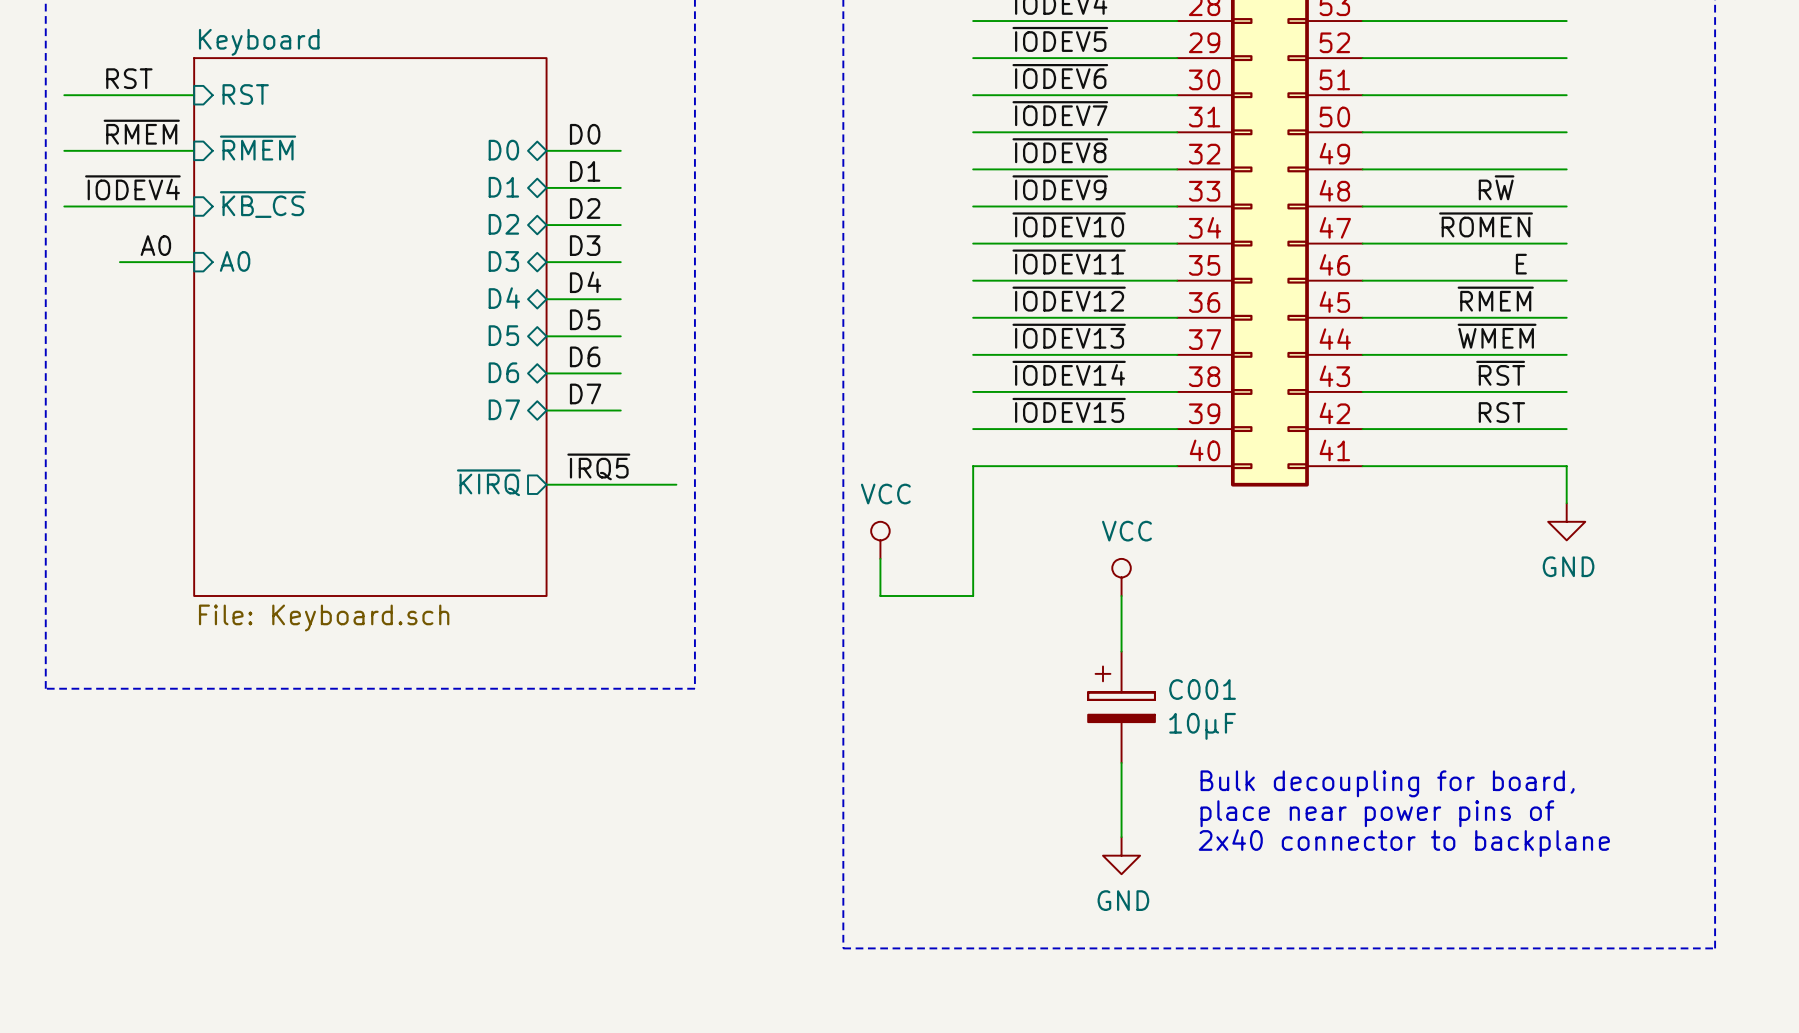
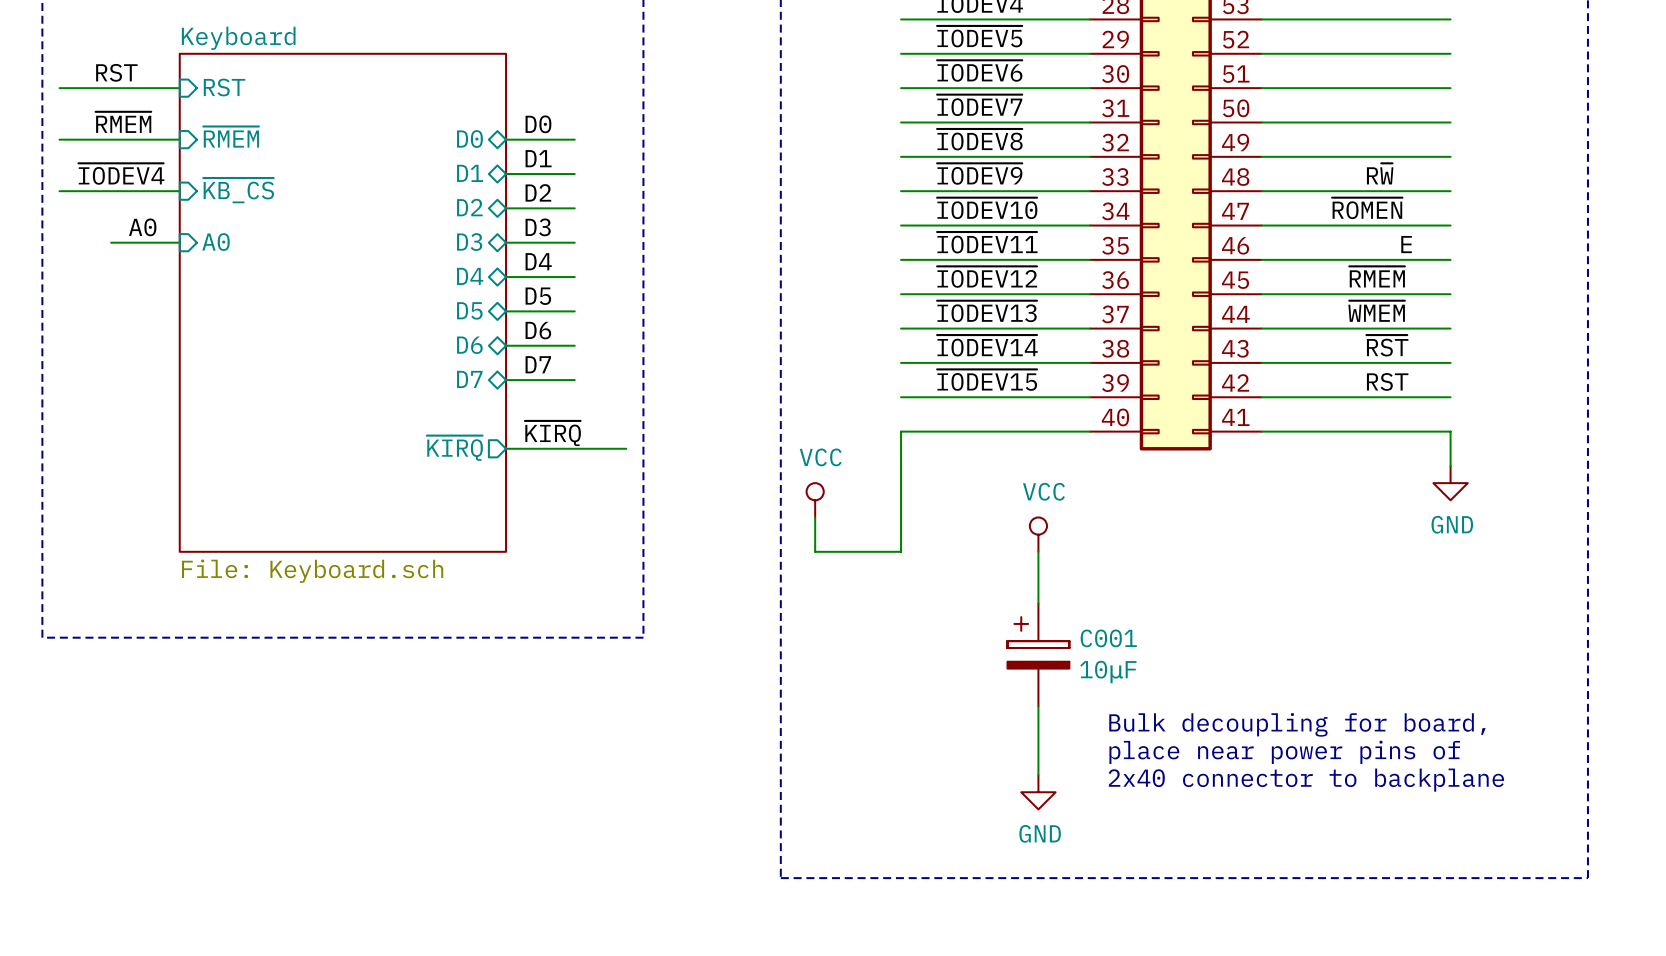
label: ~{IRQ5} (598, 466) -> ~{KIRQ} (552, 433)

